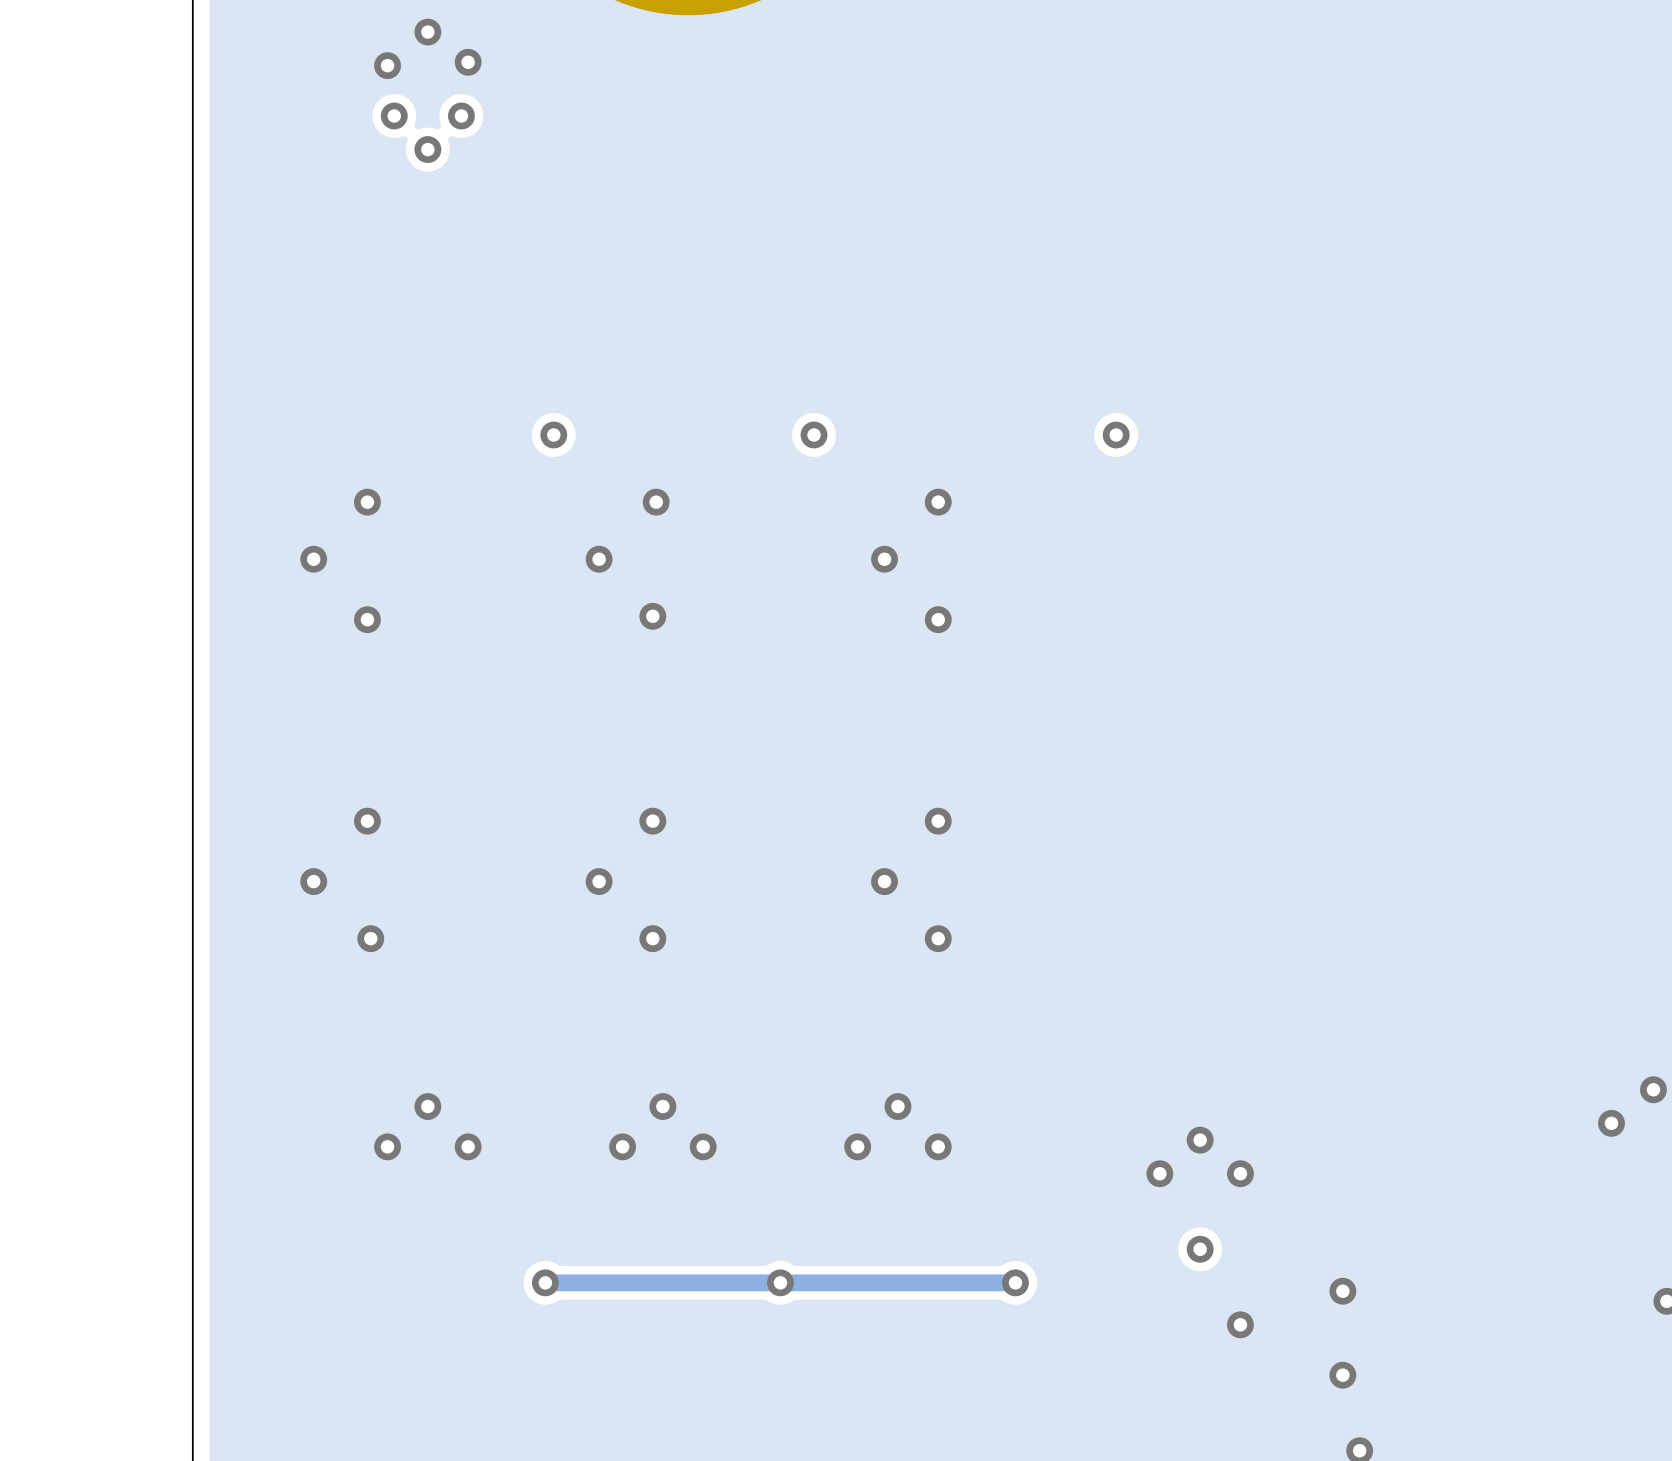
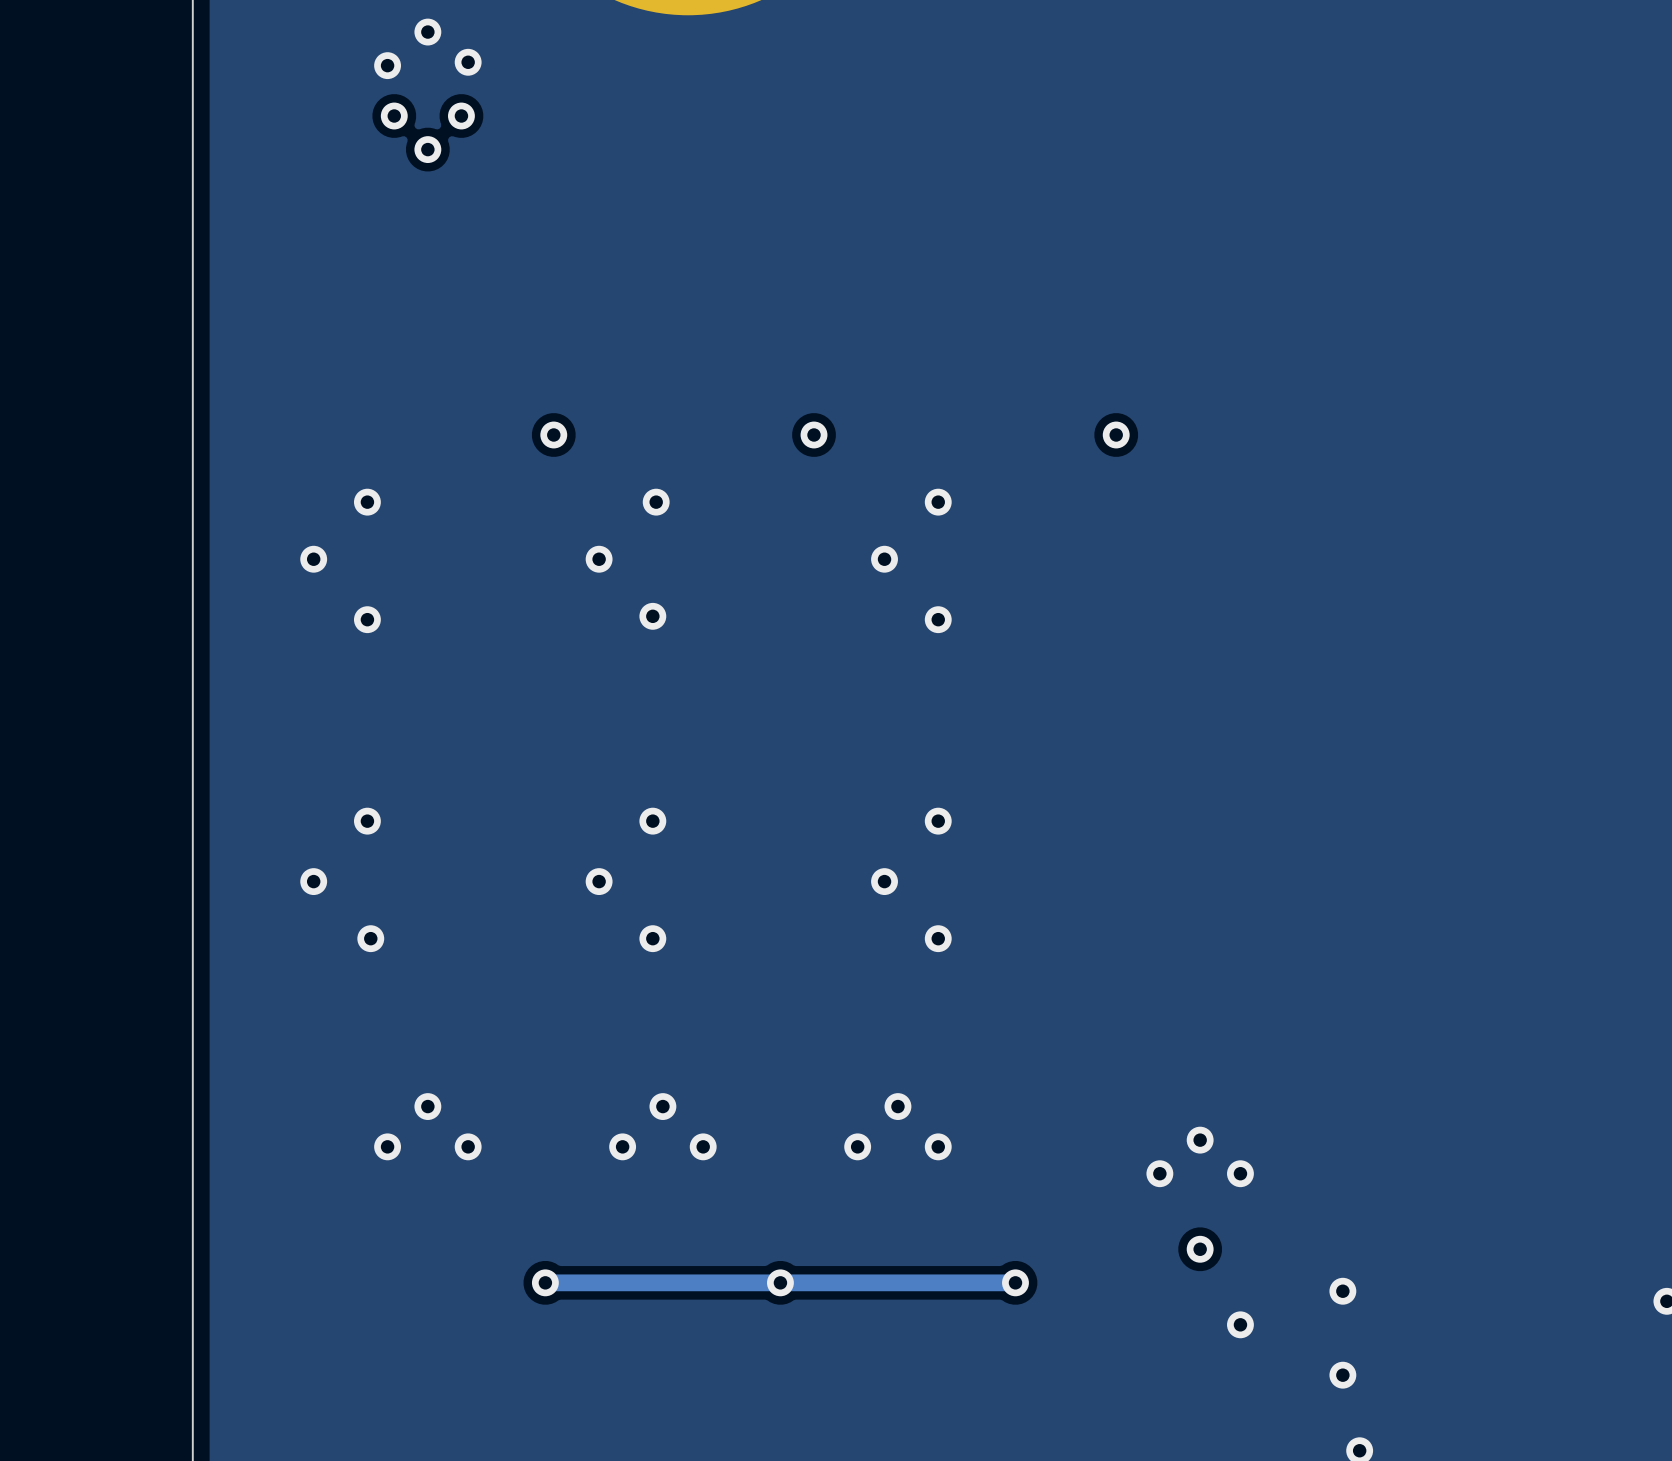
via: (1653, 1089) -> none
via: (1611, 1123) -> none

